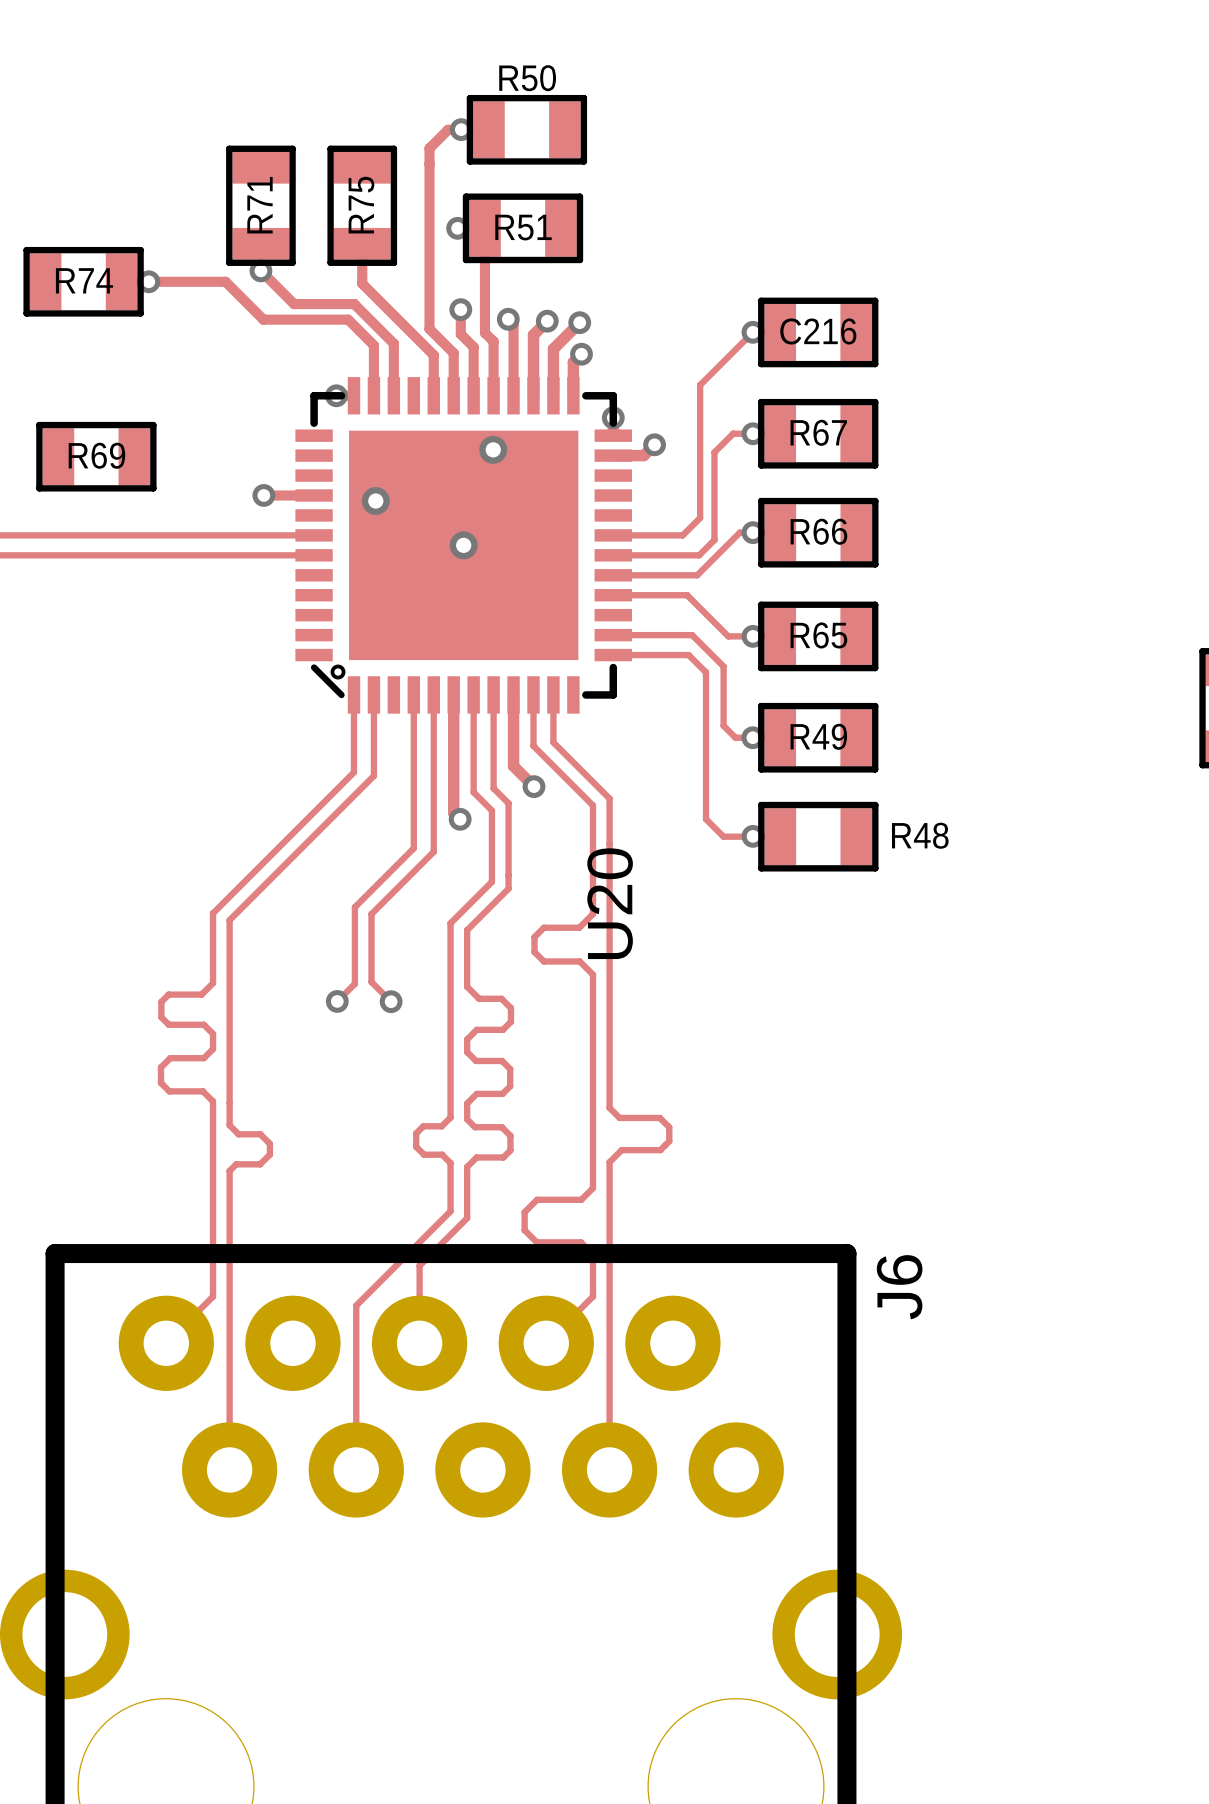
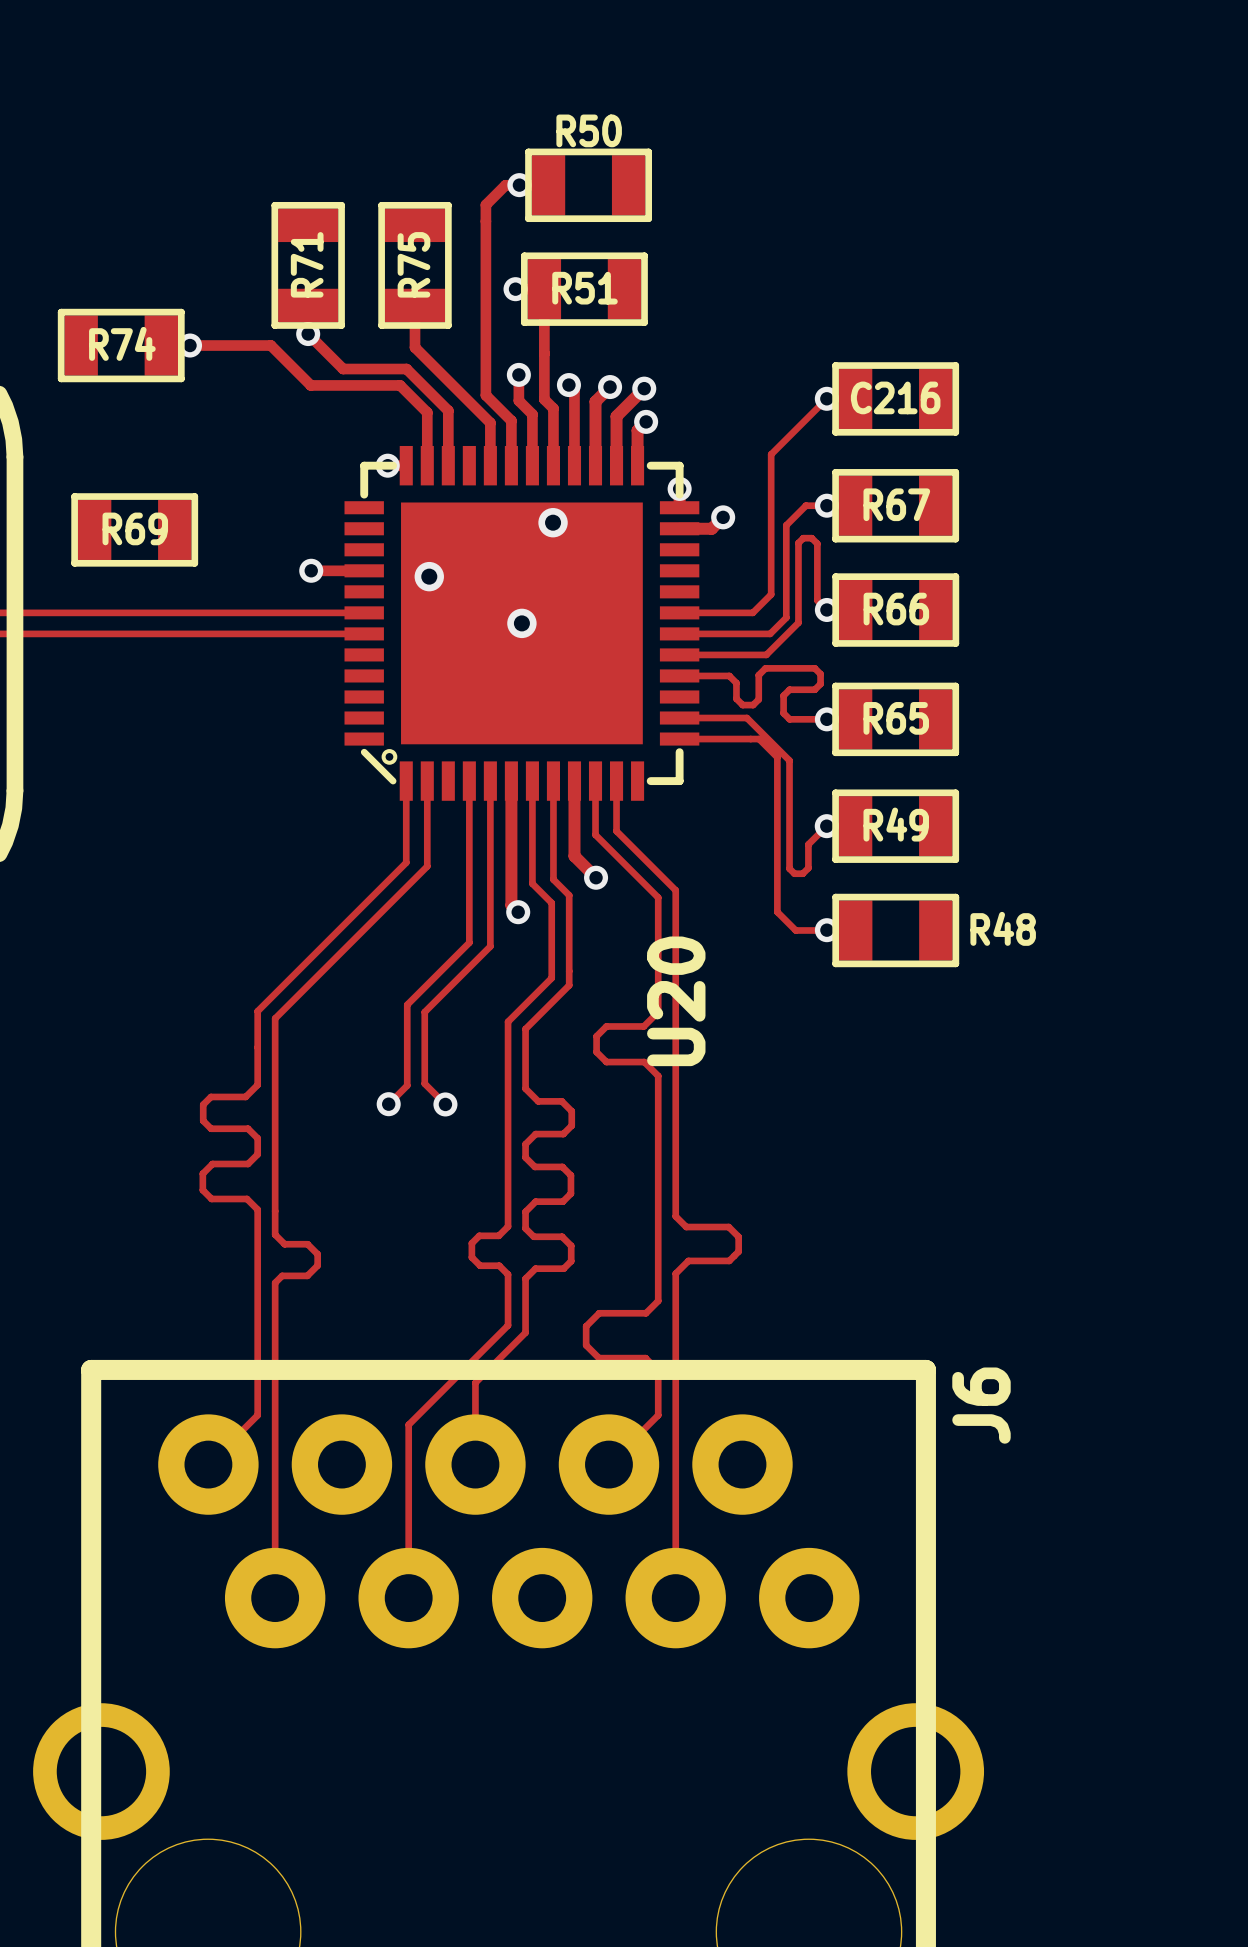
track: (753, 532) (739, 532) (695, 575) -> (826, 609) (817, 600) (817, 543) (811, 538) (803, 538) (798, 543) (798, 622) (766, 654)
track: (660, 595) (687, 595) (728, 636) -> (729, 675) (736, 683) (736, 698) (742, 705) (753, 705) (758, 699) (758, 675) (765, 668) (814, 668) (820, 674) (820, 683) (814, 689) (789, 689) (783, 695) (783, 713) (789, 719) (800, 719)
track: (677, 635) (692, 635) (723, 666) (723, 725) (735, 737) (752, 737) -> (746, 718) (789, 760) (789, 868) (794, 873) (802, 873) (808, 868) (808, 844) (826, 826)

